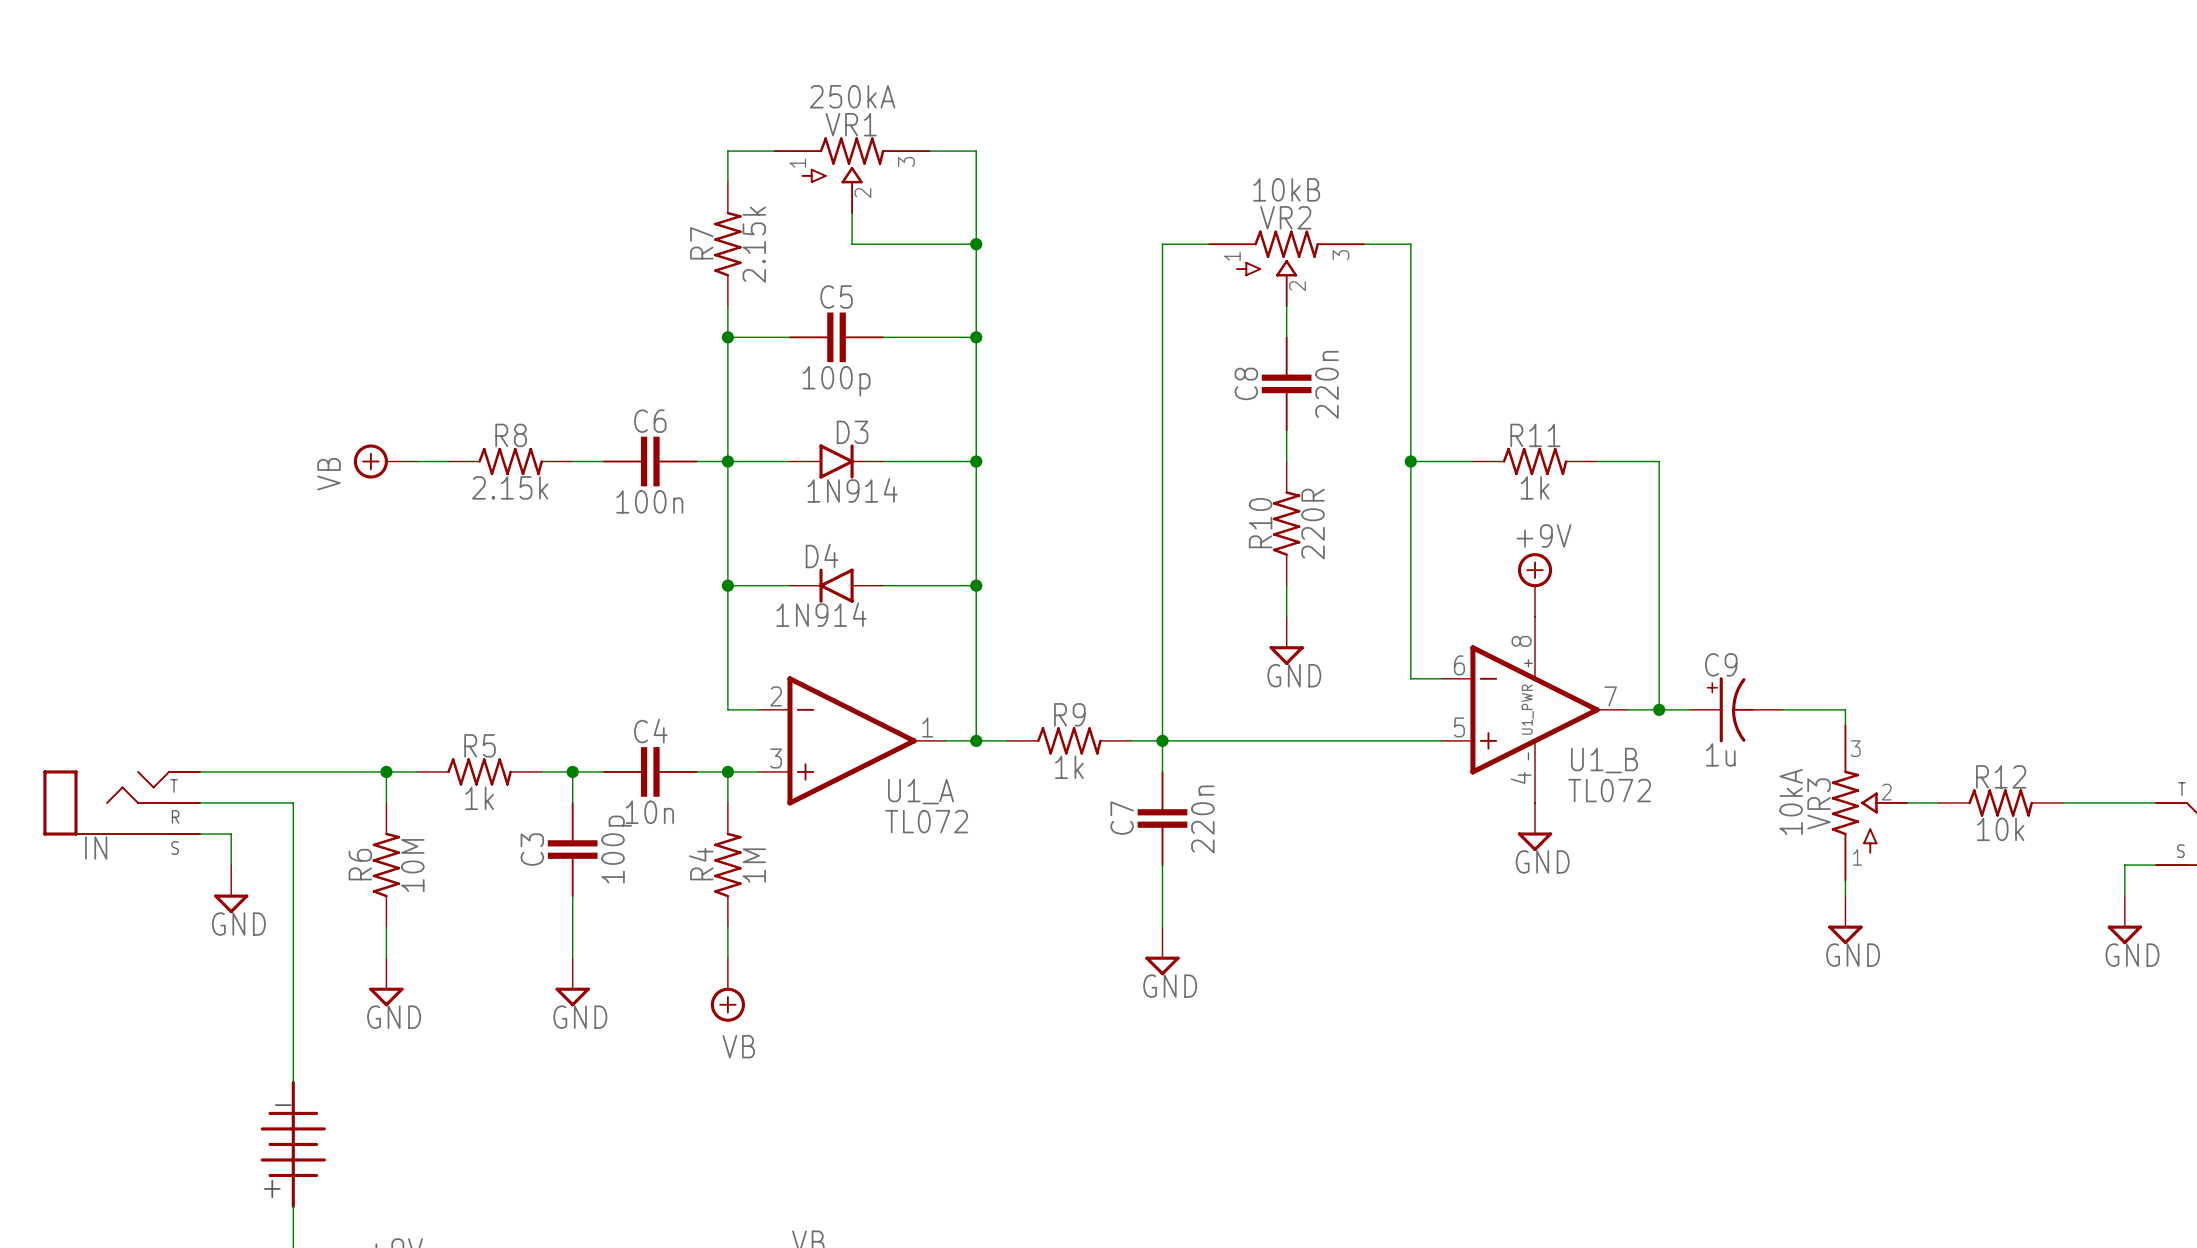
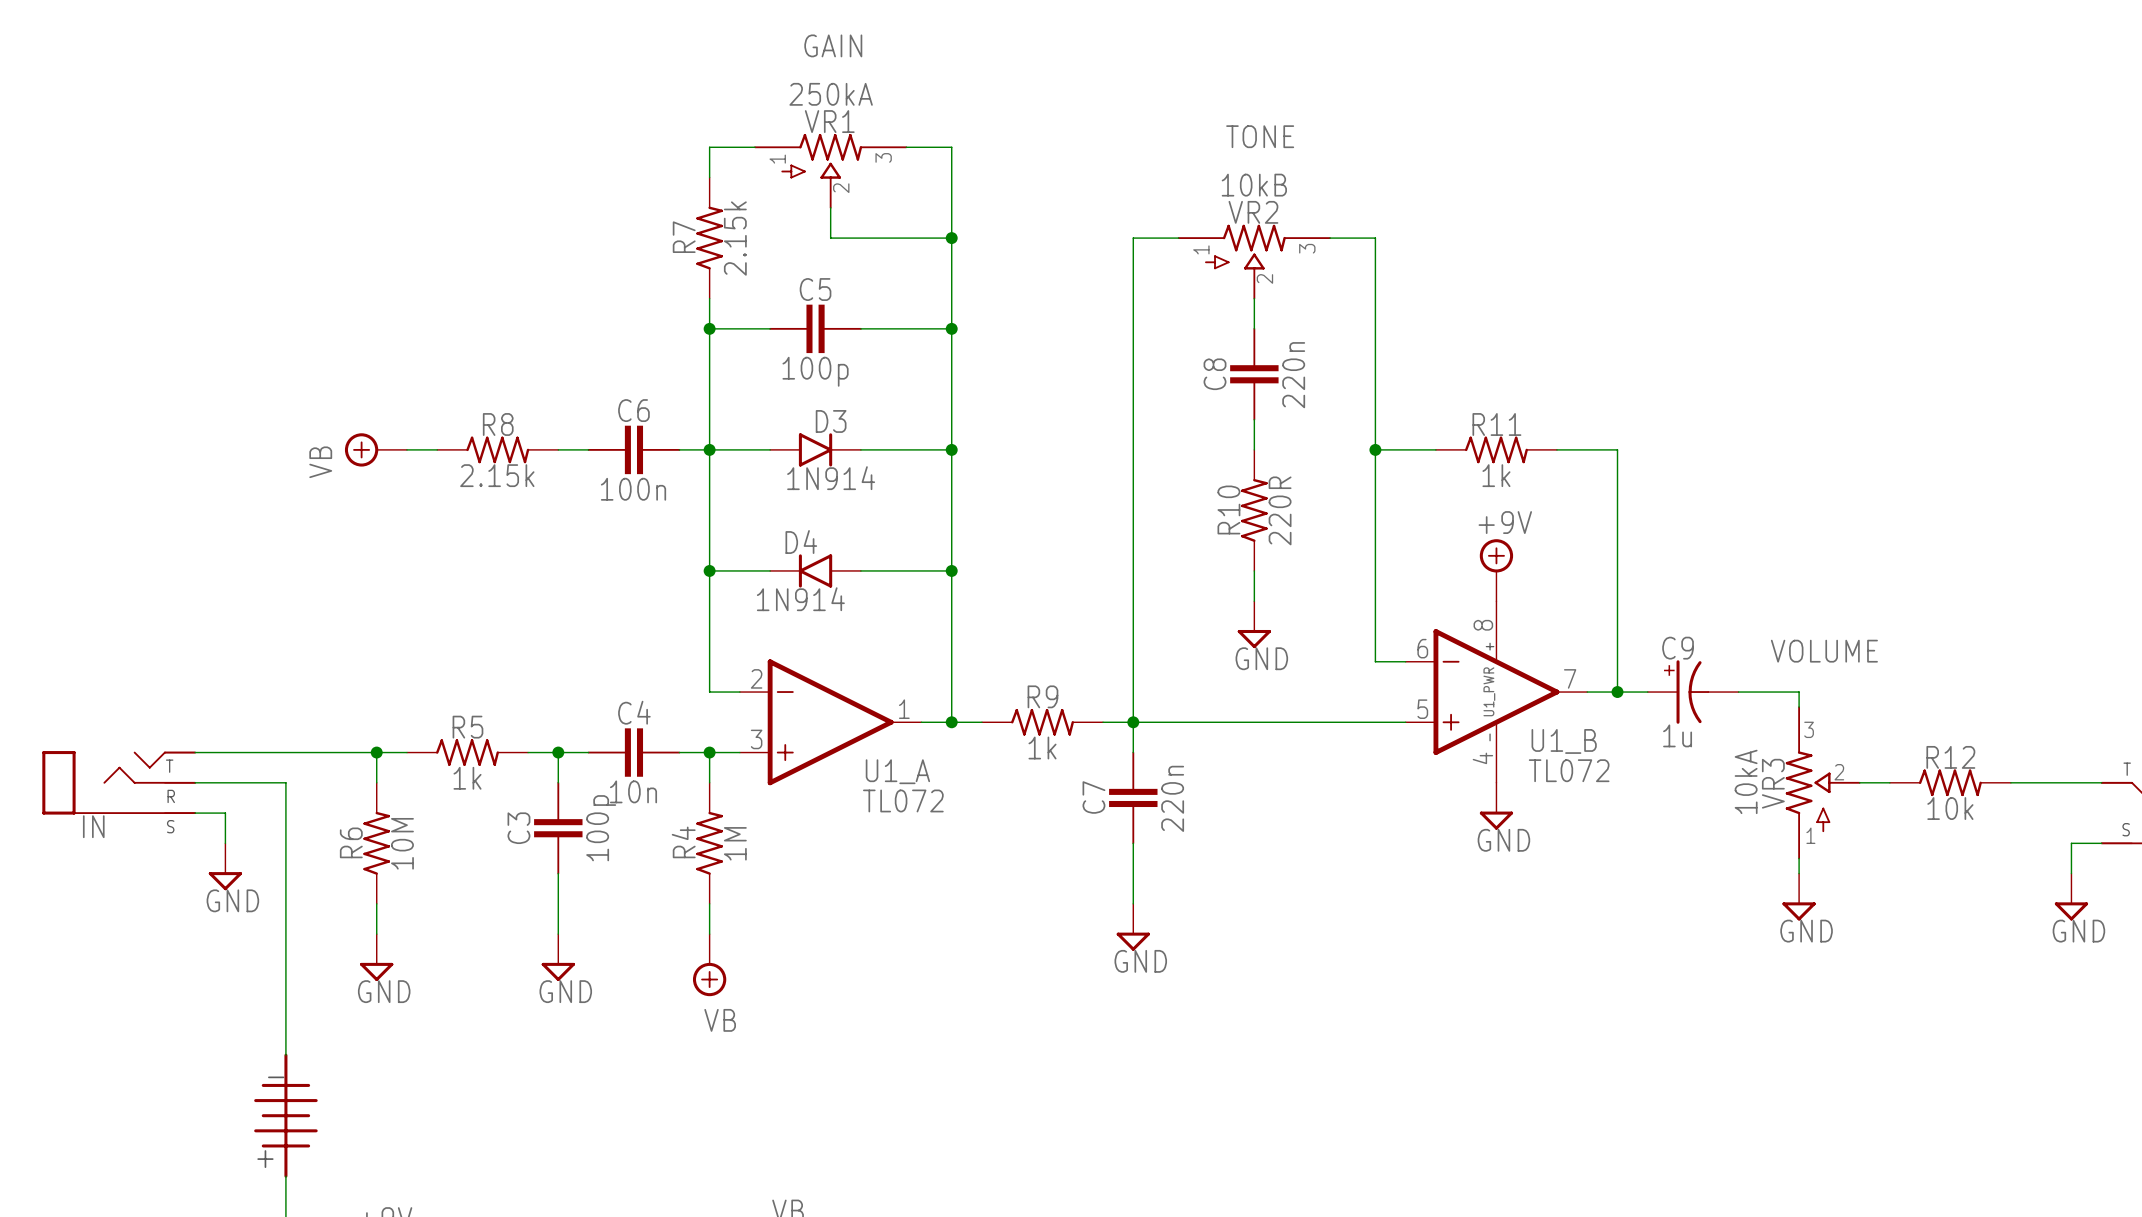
text: none -> GAIN (833, 45)
text: none -> TONE (1260, 136)
text: none -> VOLUME (1824, 651)

